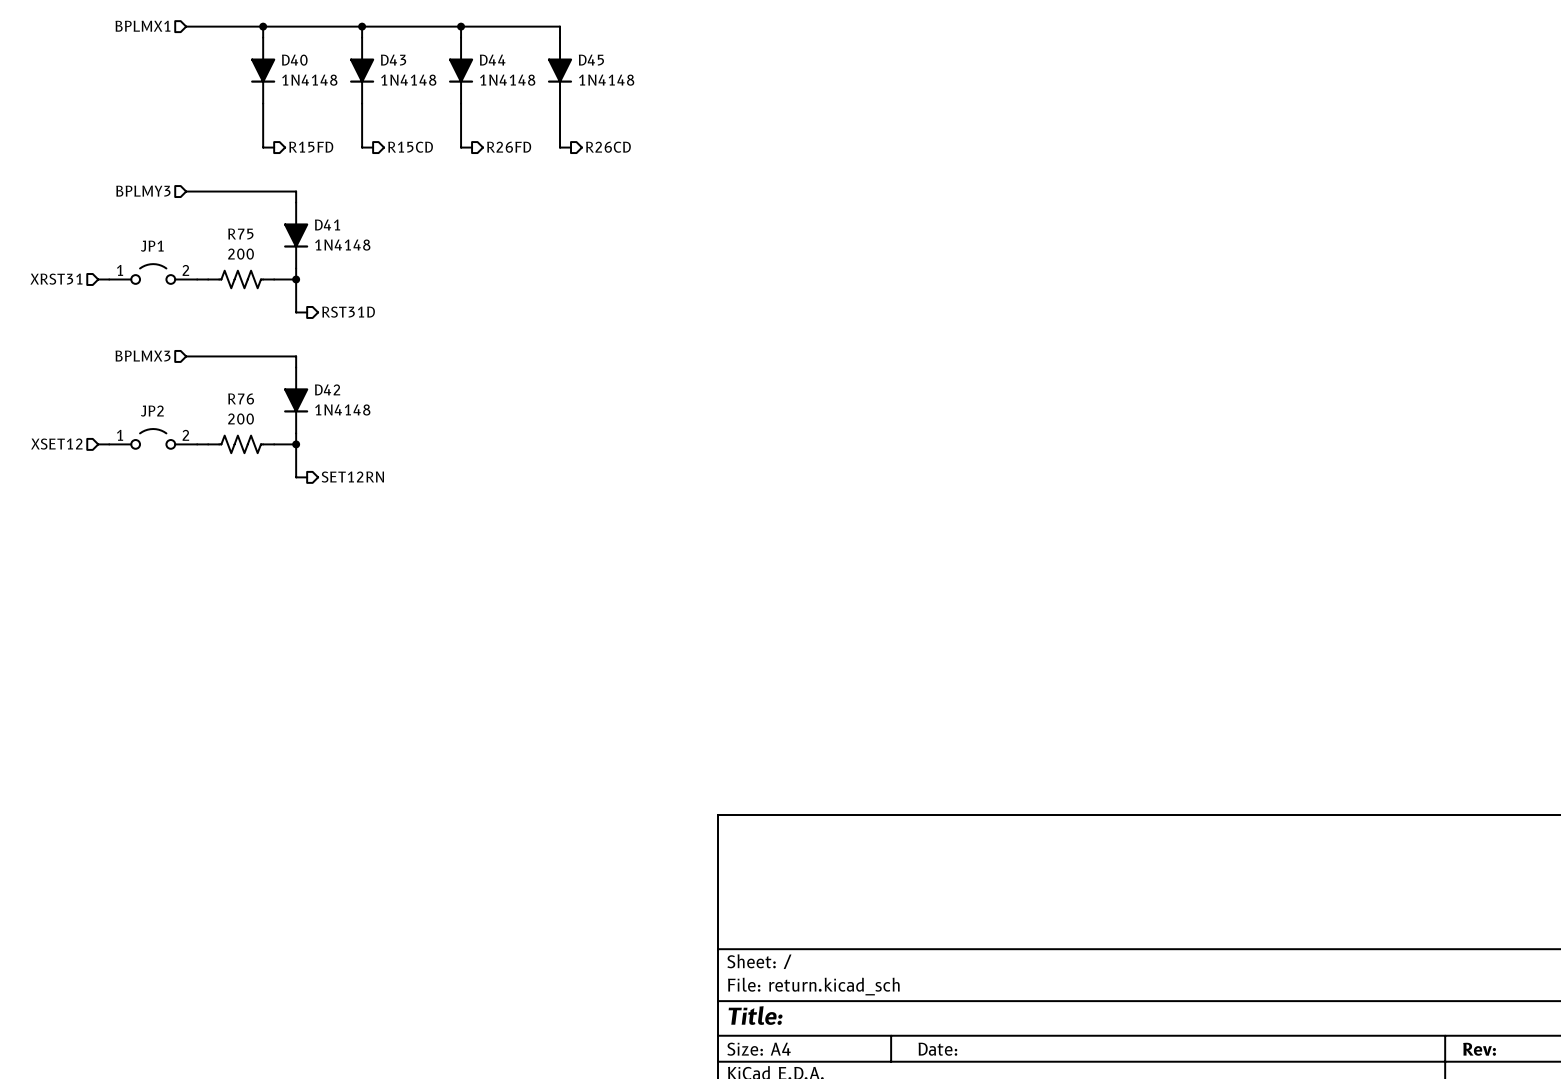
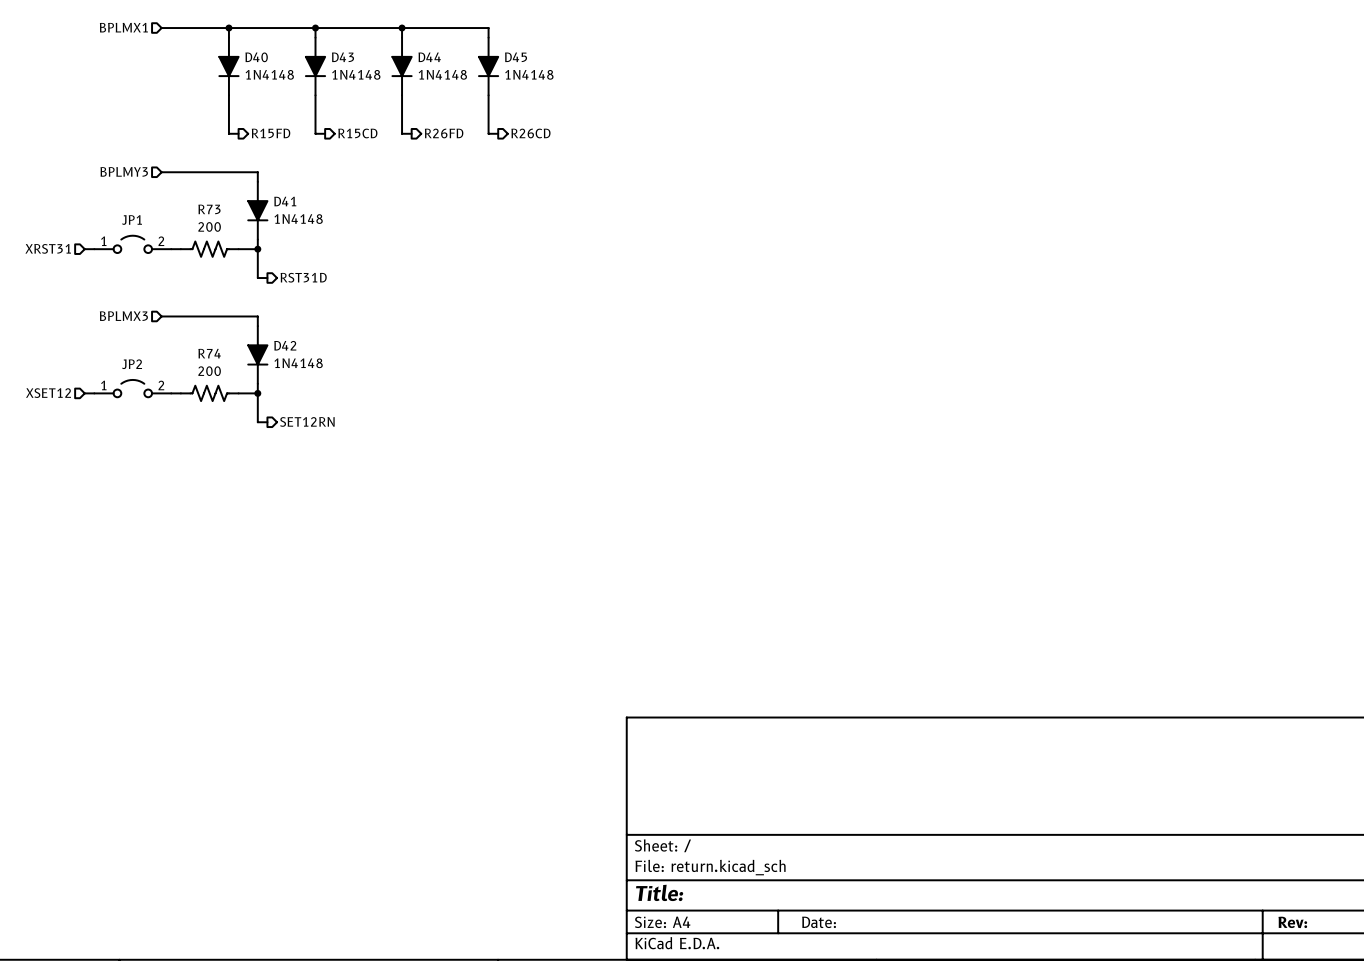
R75 name: R75 (240, 234) -> R73 (209, 209)
R76 name: R76 (241, 398) -> R74 (209, 353)

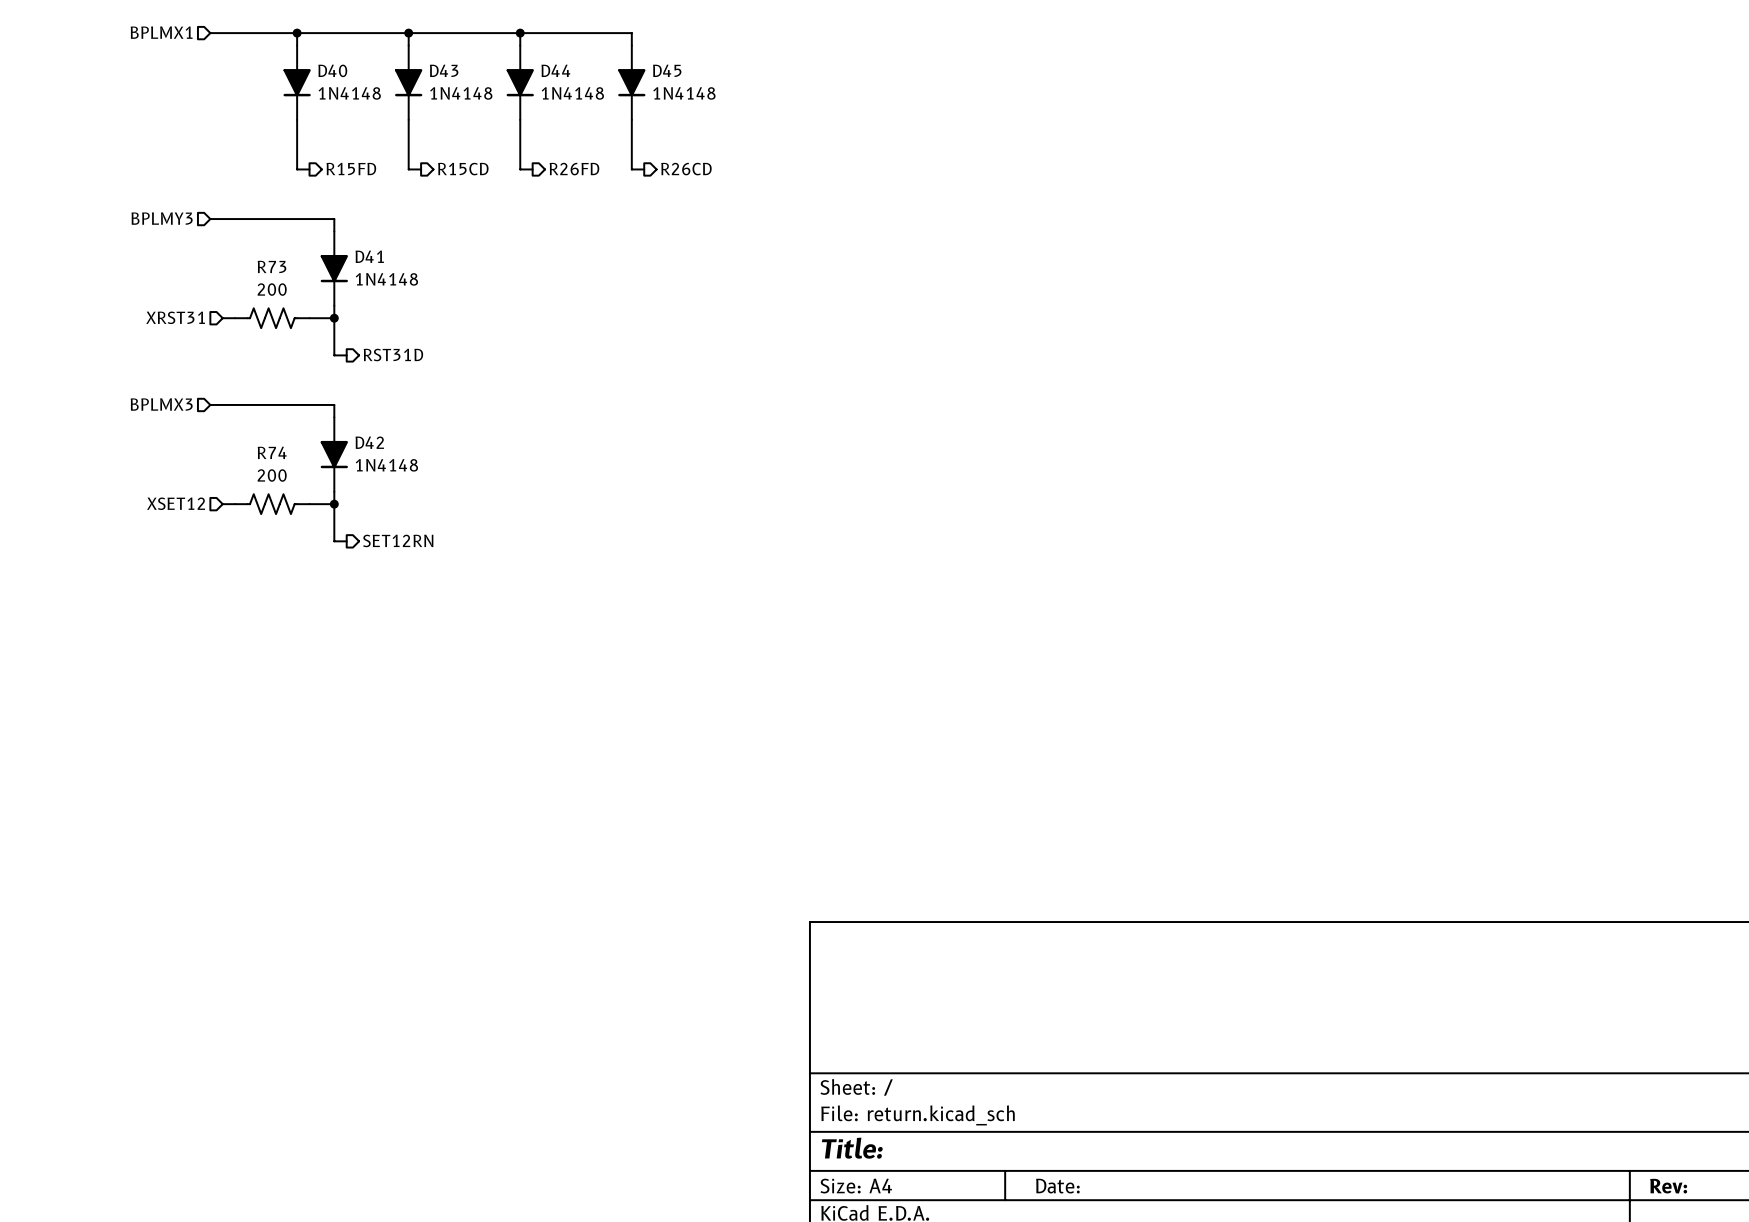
JP1: (132, 244) -> none
hierarchical label position: XRST31 (48, 248) -> XRST31 (175, 317)
wire: (84, 249) (94, 249) -> none
JP2: (132, 388) -> none
hierarchical label position: XSET12 (48, 393) -> XSET12 (176, 503)
wire: (84, 393) (94, 393) -> none

